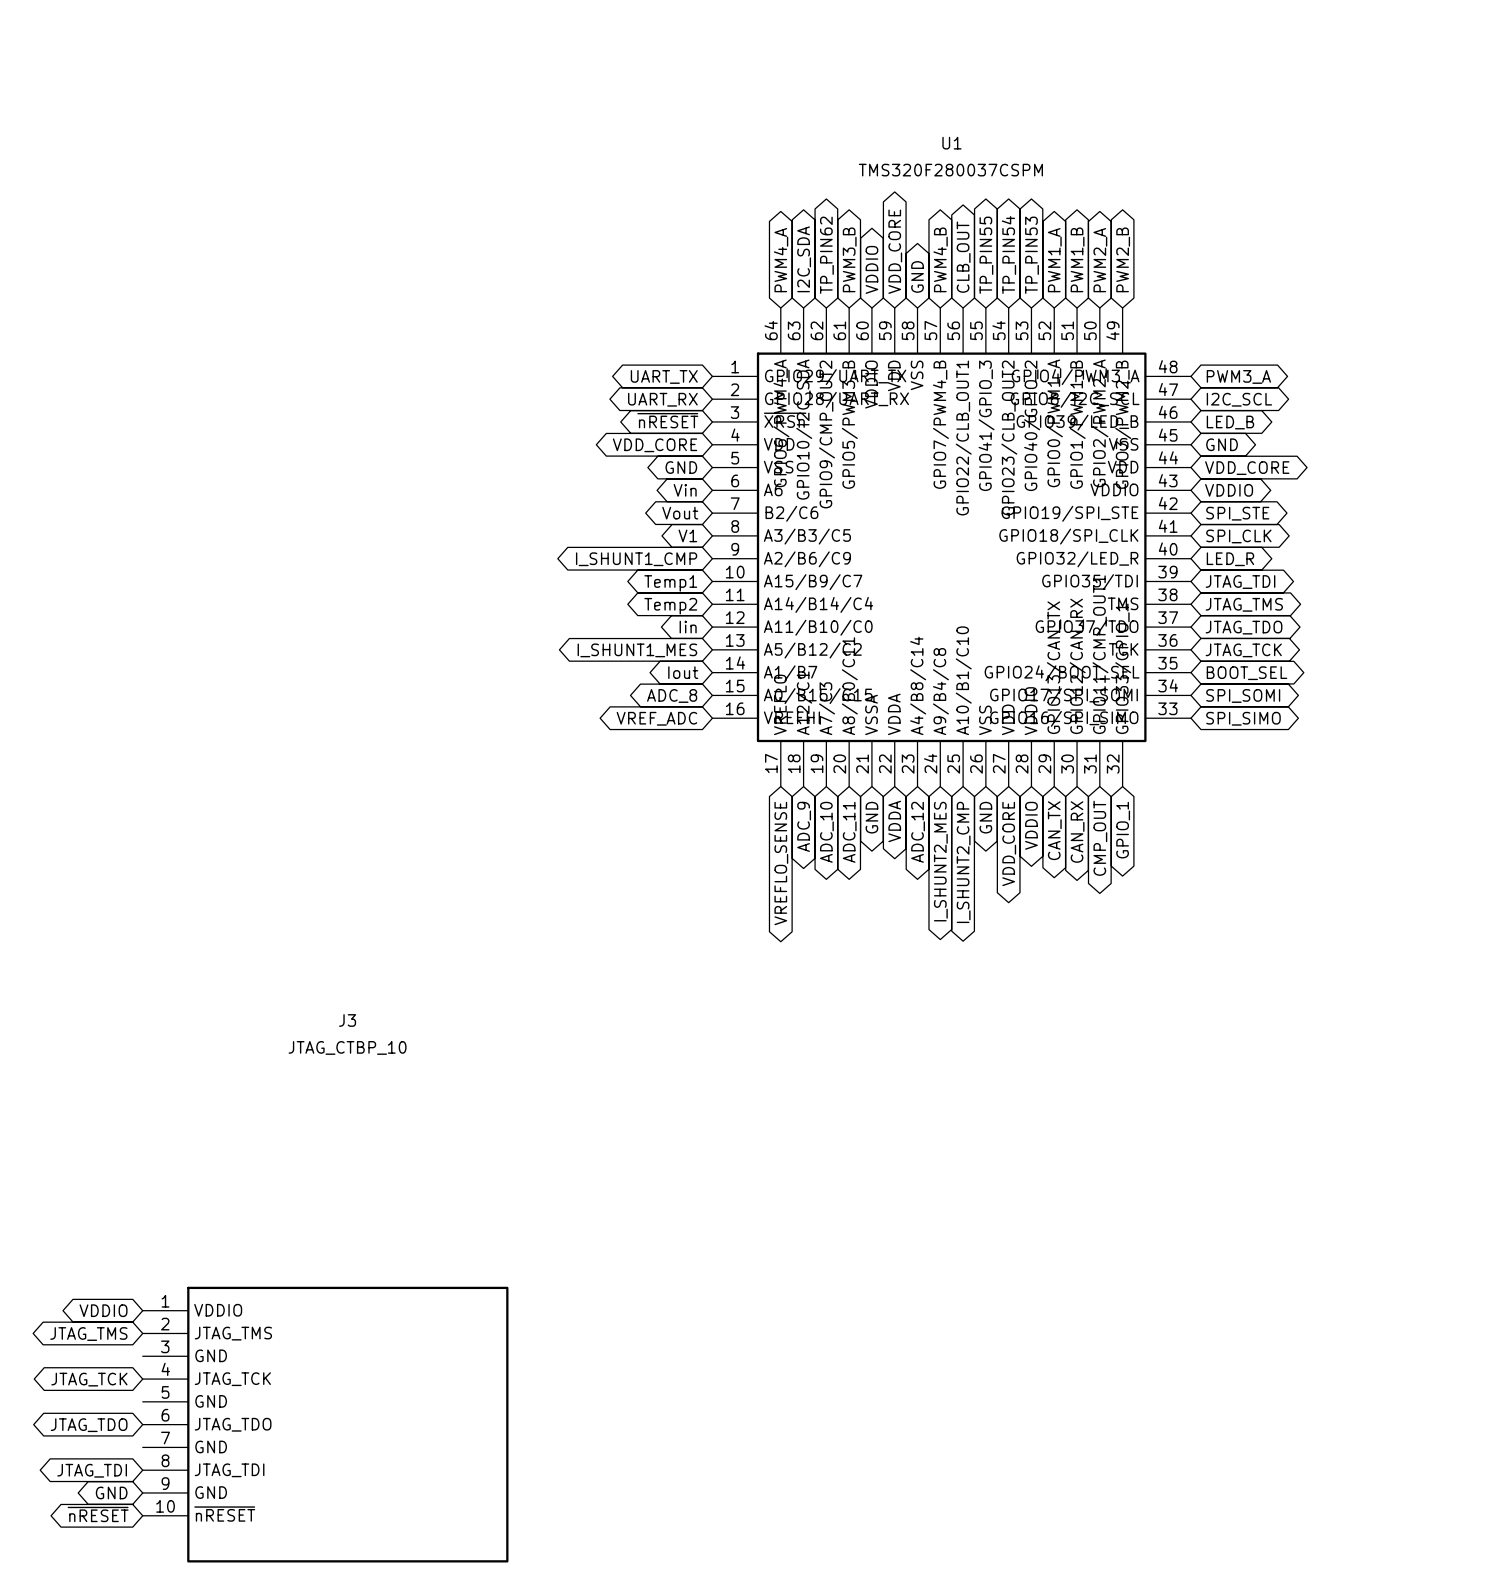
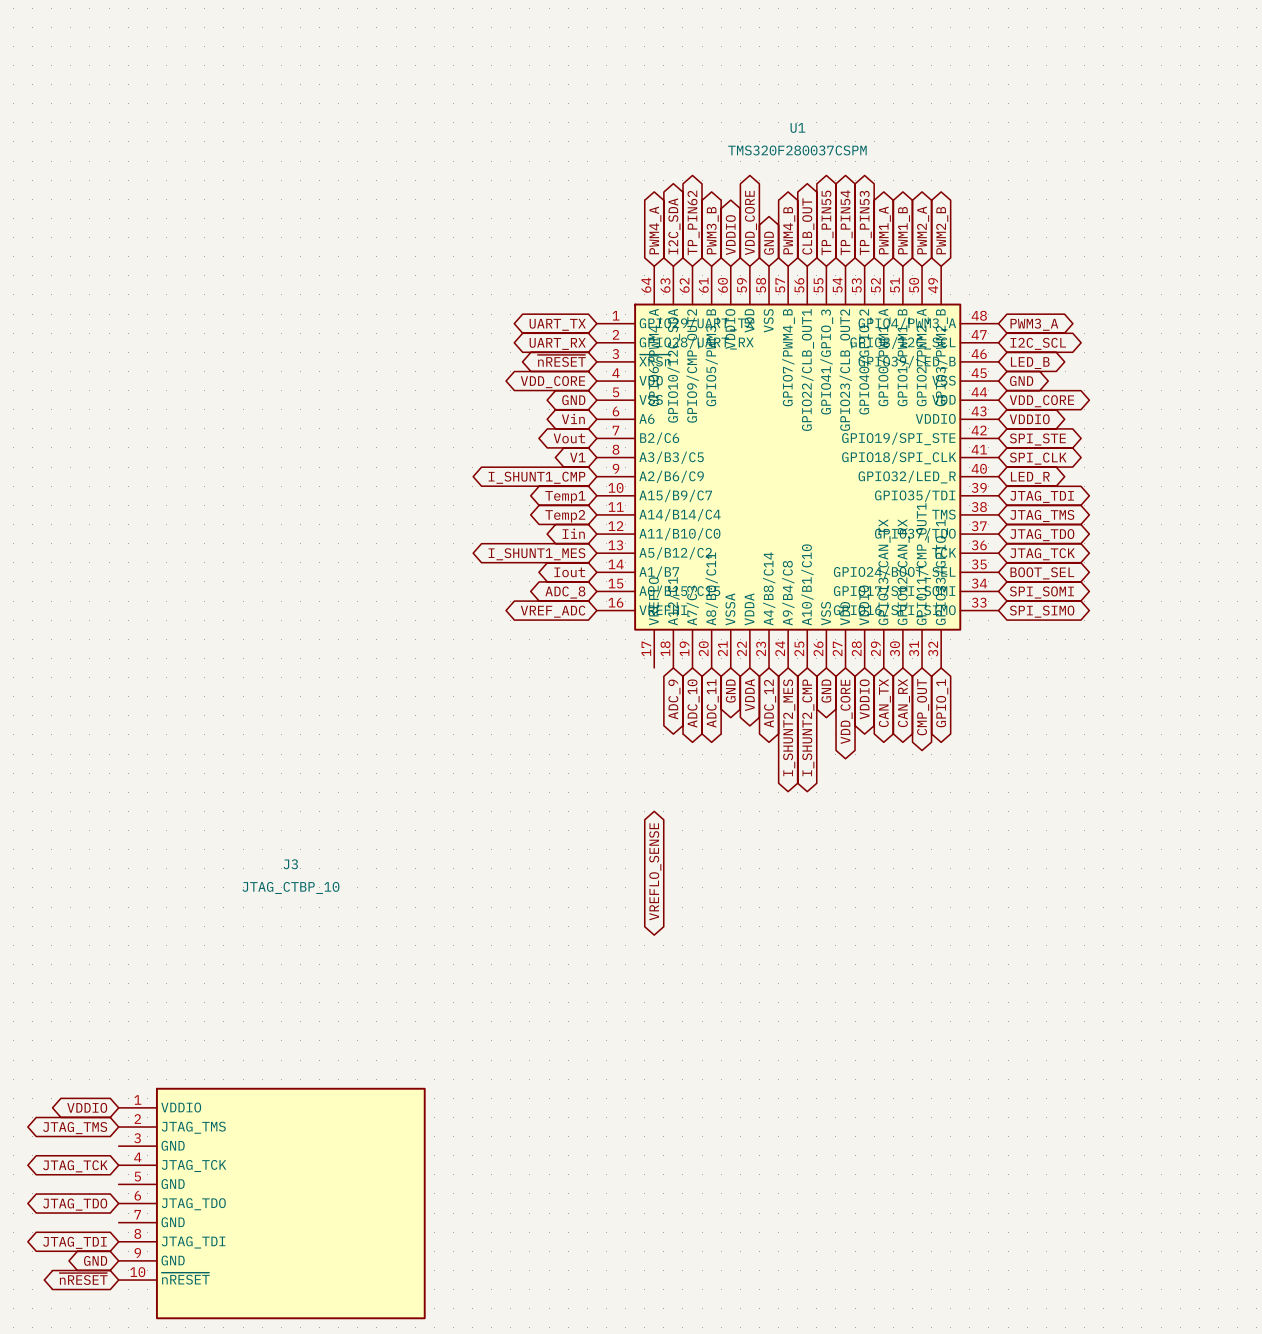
global label position: VREFLO_SENSE (781, 863) -> VREFLO_SENSE (655, 871)

